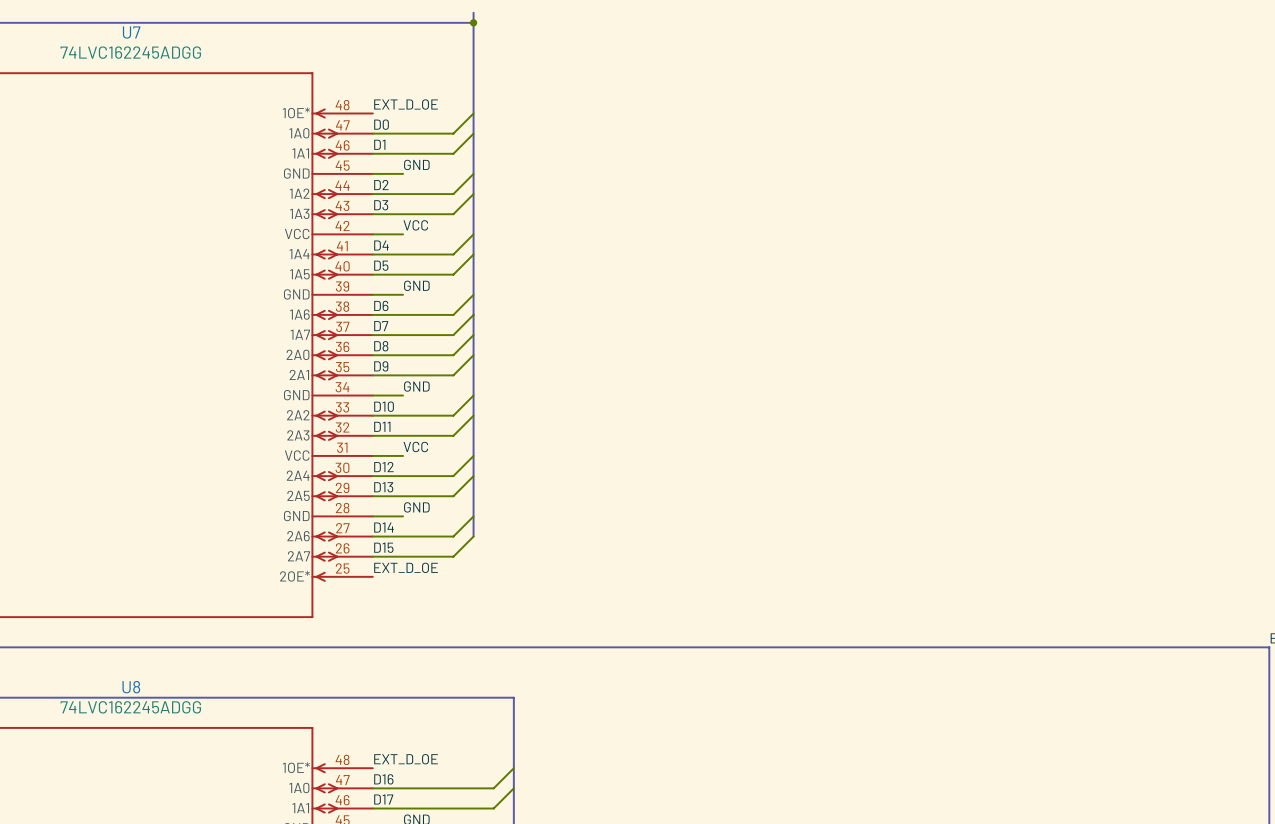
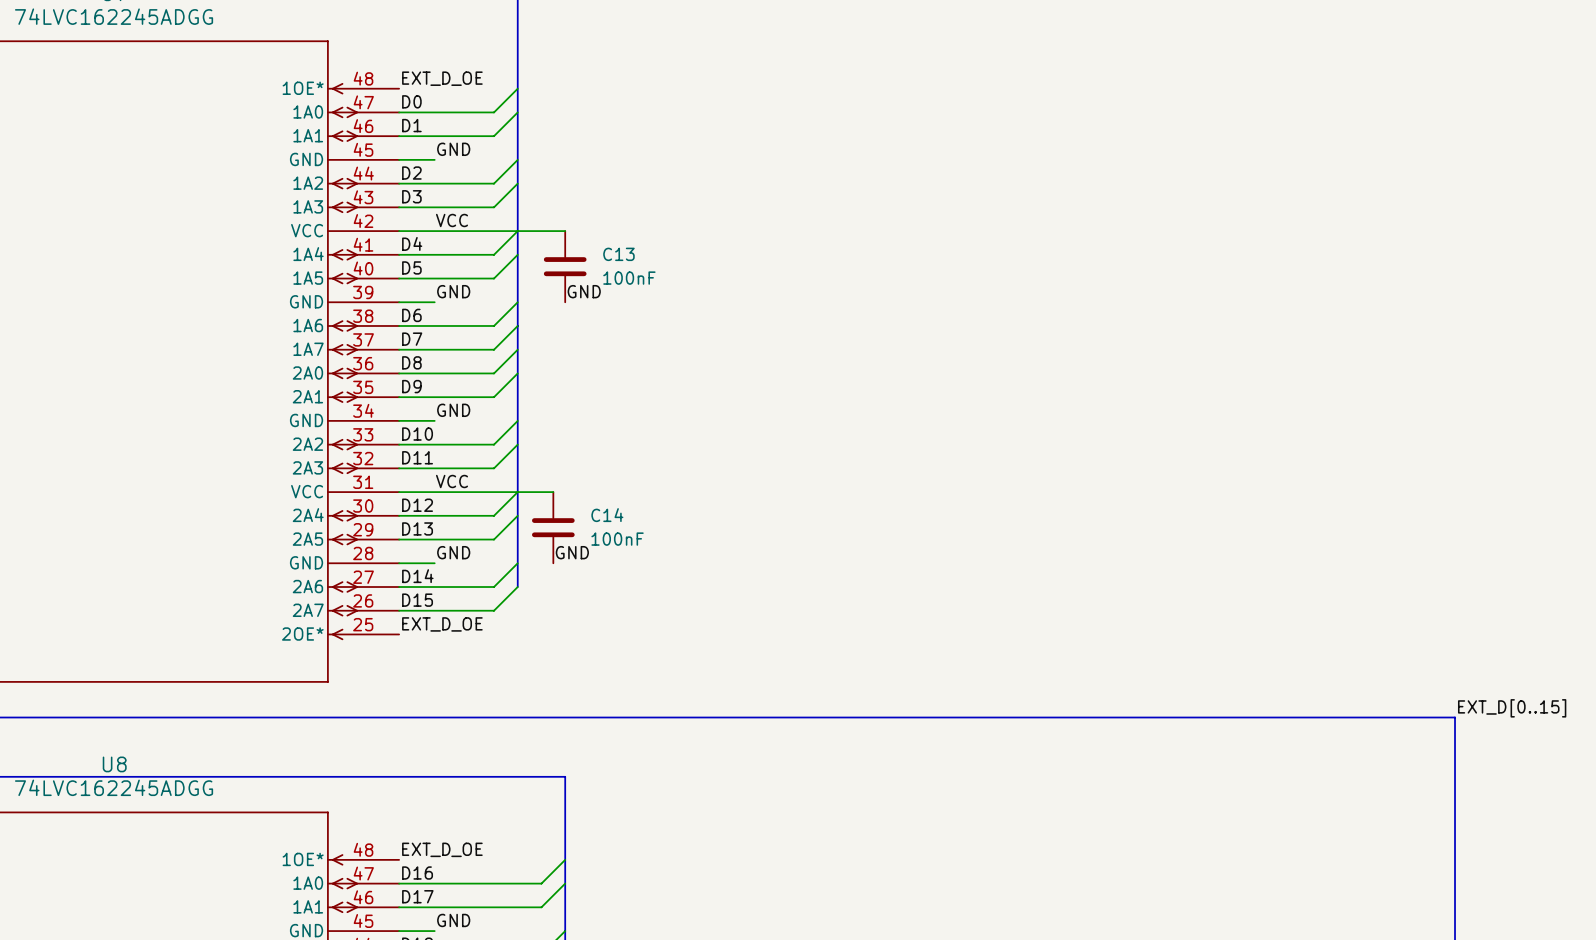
wire: none -> (434, 231) (565, 231)
C13: none -> 100nF (565, 266)
label: none -> GND (584, 291)
wire: none -> (434, 492) (553, 492)
C14: none -> 100nF (553, 527)
label: none -> GND (572, 552)

